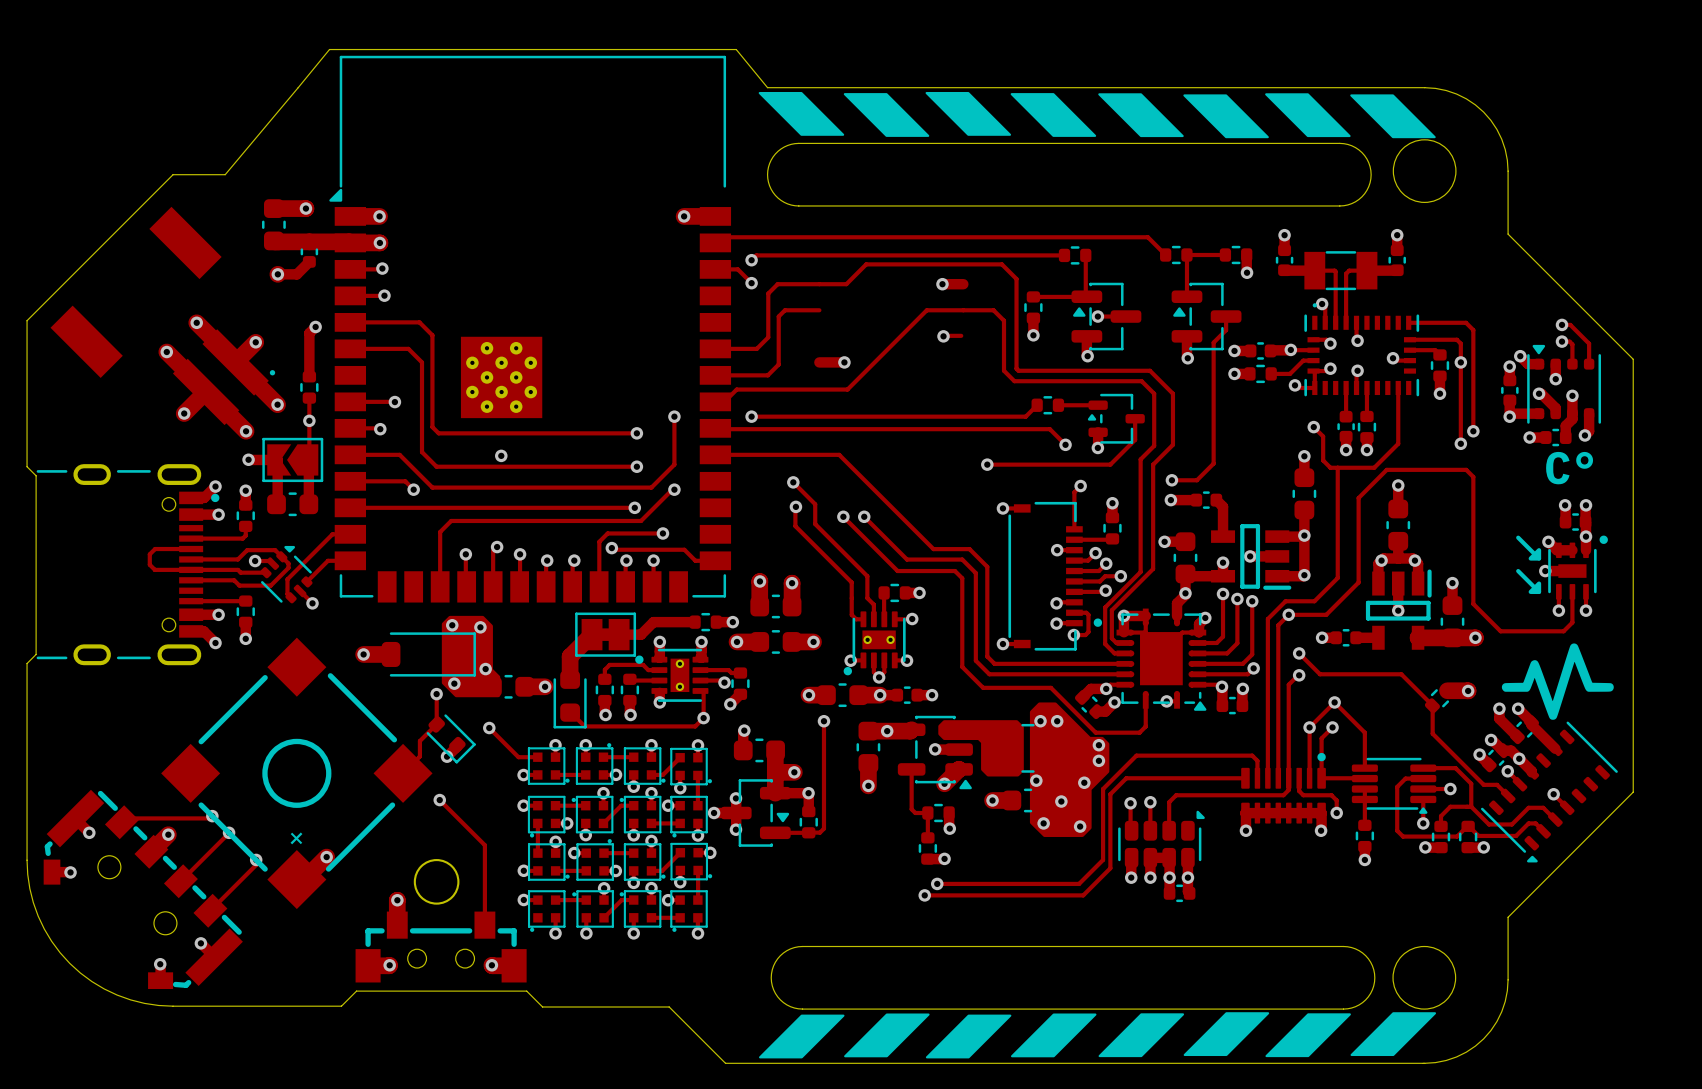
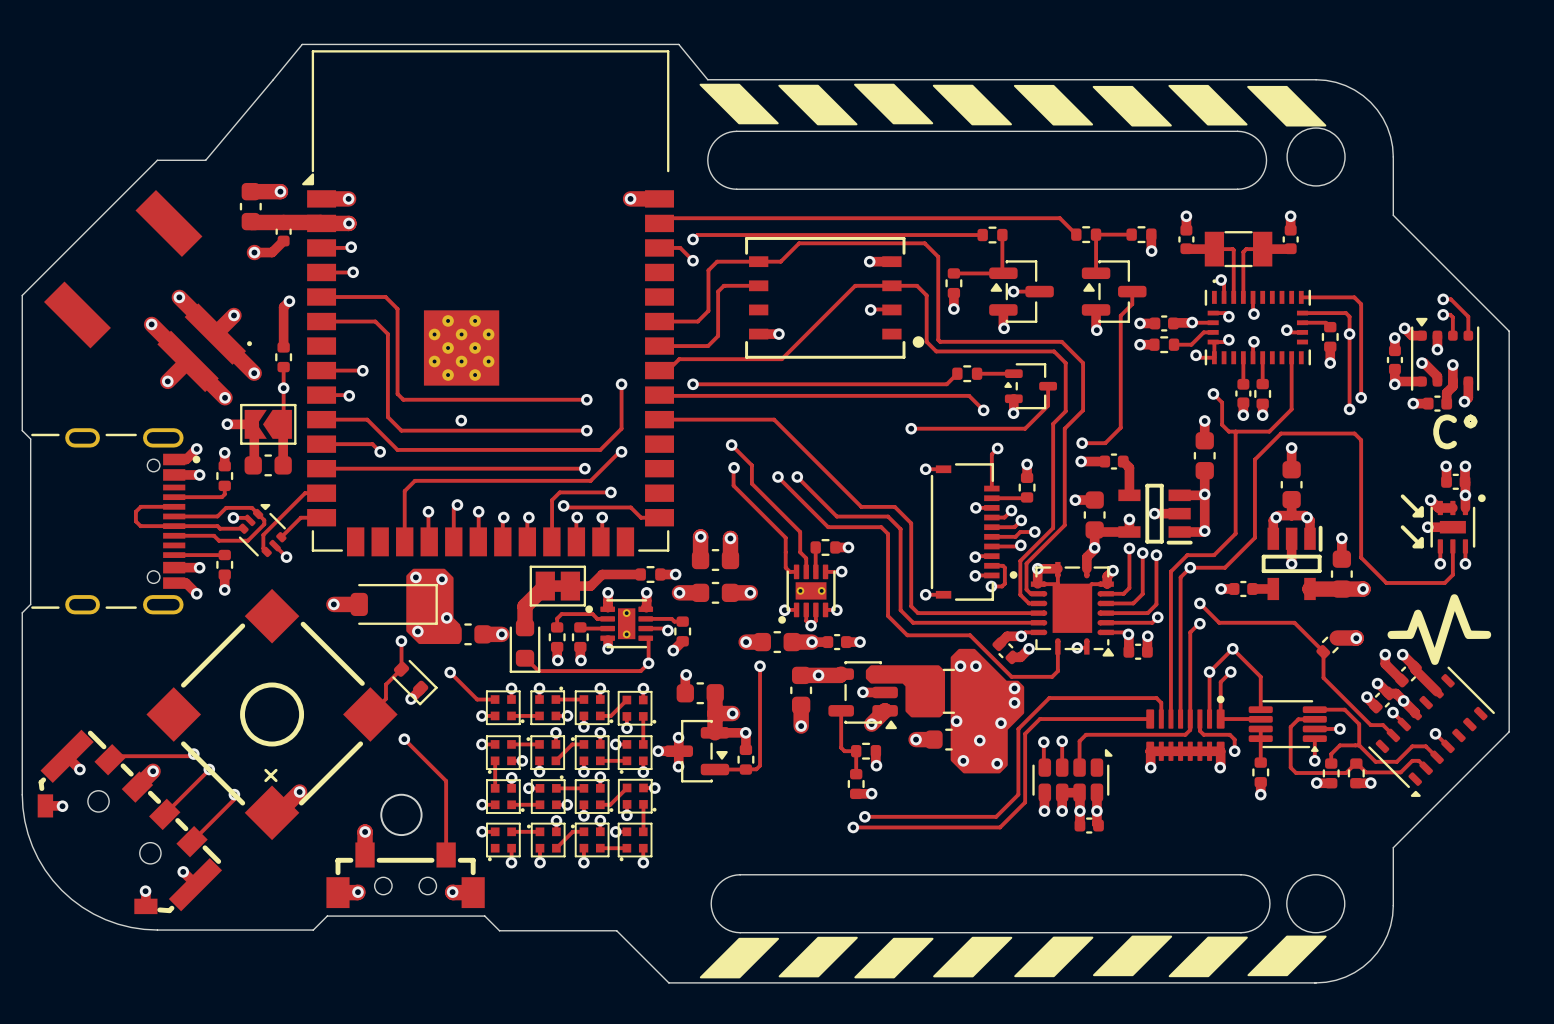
part: none -> (834, 297)

